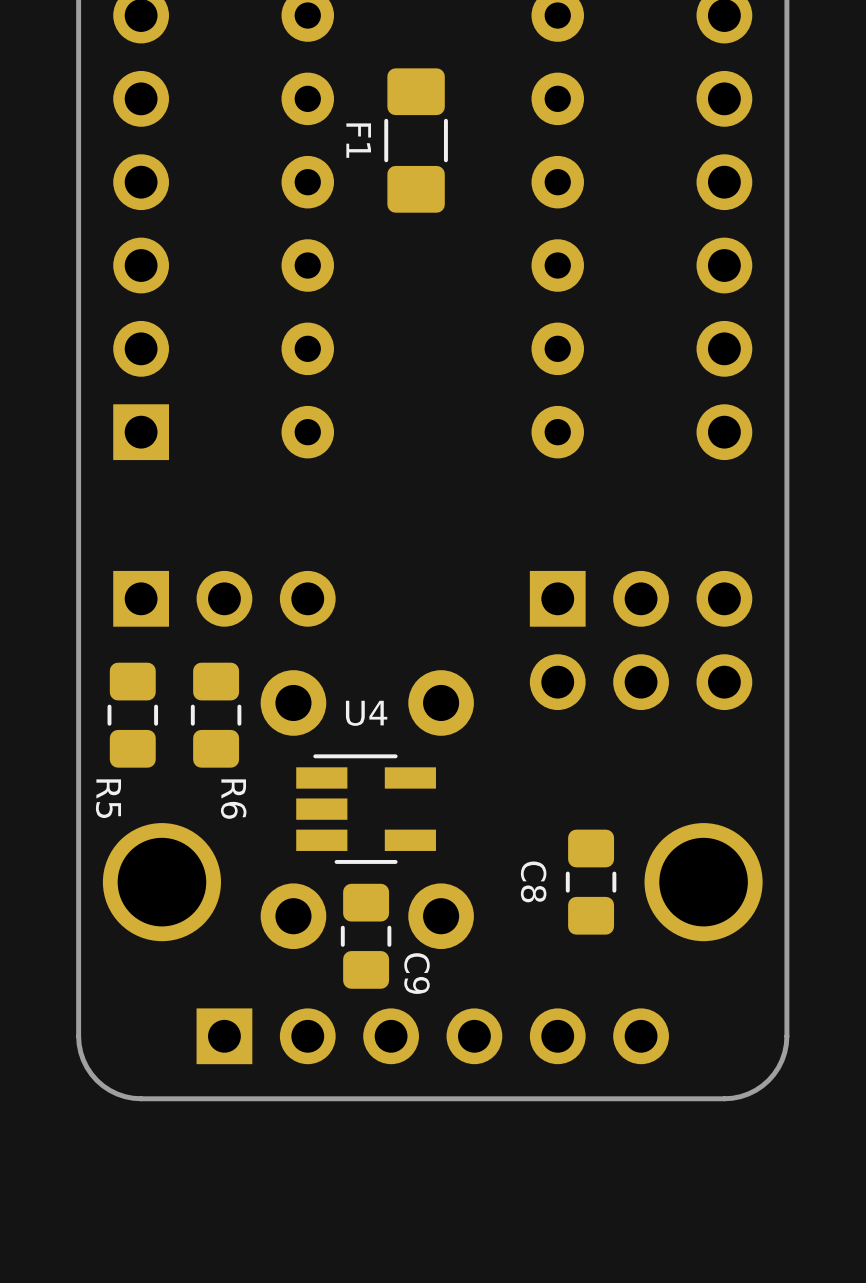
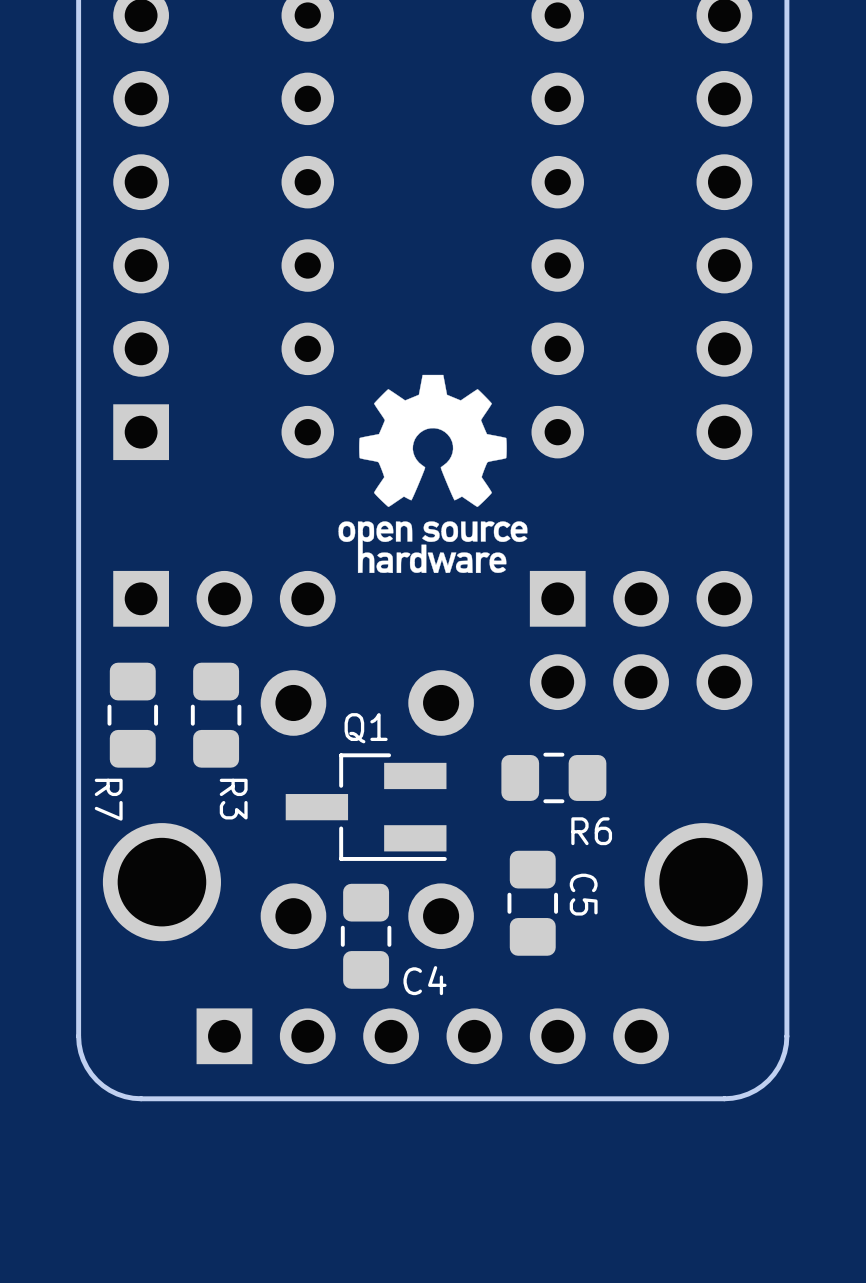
F1: (416, 140) -> none
drawing: none -> [338, 374, 528, 574]
R6: none -> (553, 777)
R5 name: R5 (108, 798) -> R7 (108, 799)
R6 name: R6 (233, 799) -> R3 (233, 799)
Q1: none -> (366, 807)
U4: (366, 809) -> none
C8: (591, 882) -> none
C5: none -> (532, 903)
C9 name: C9 (416, 973) -> C4 (425, 980)

